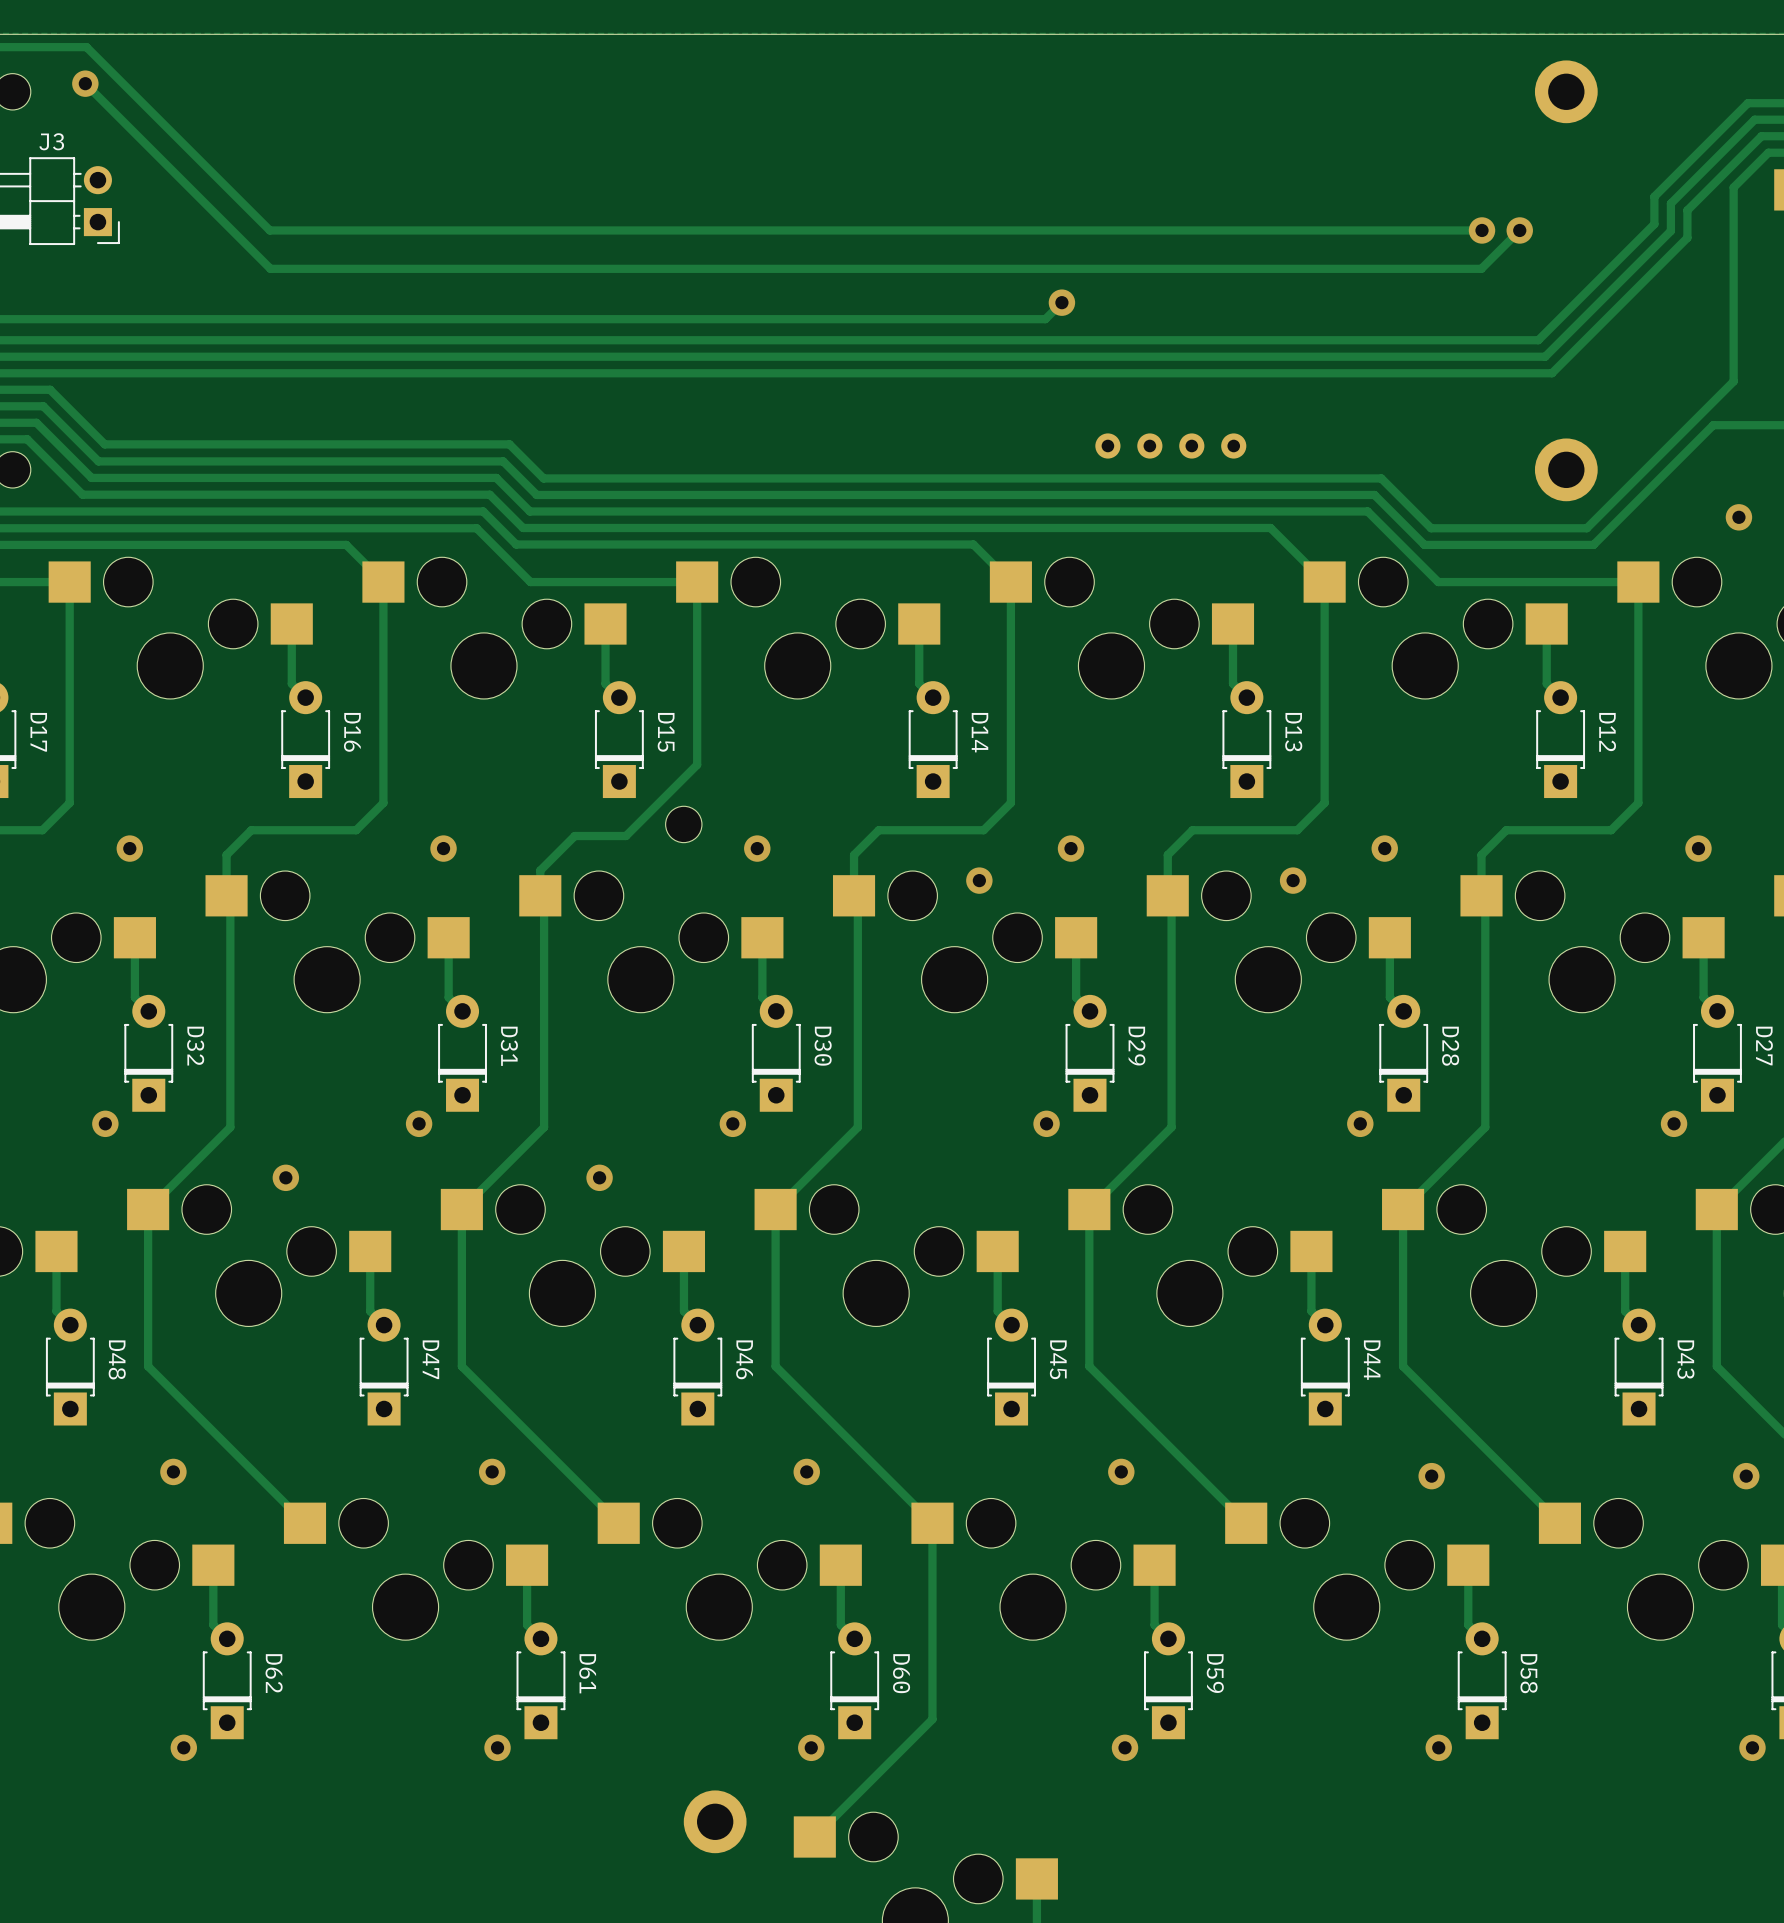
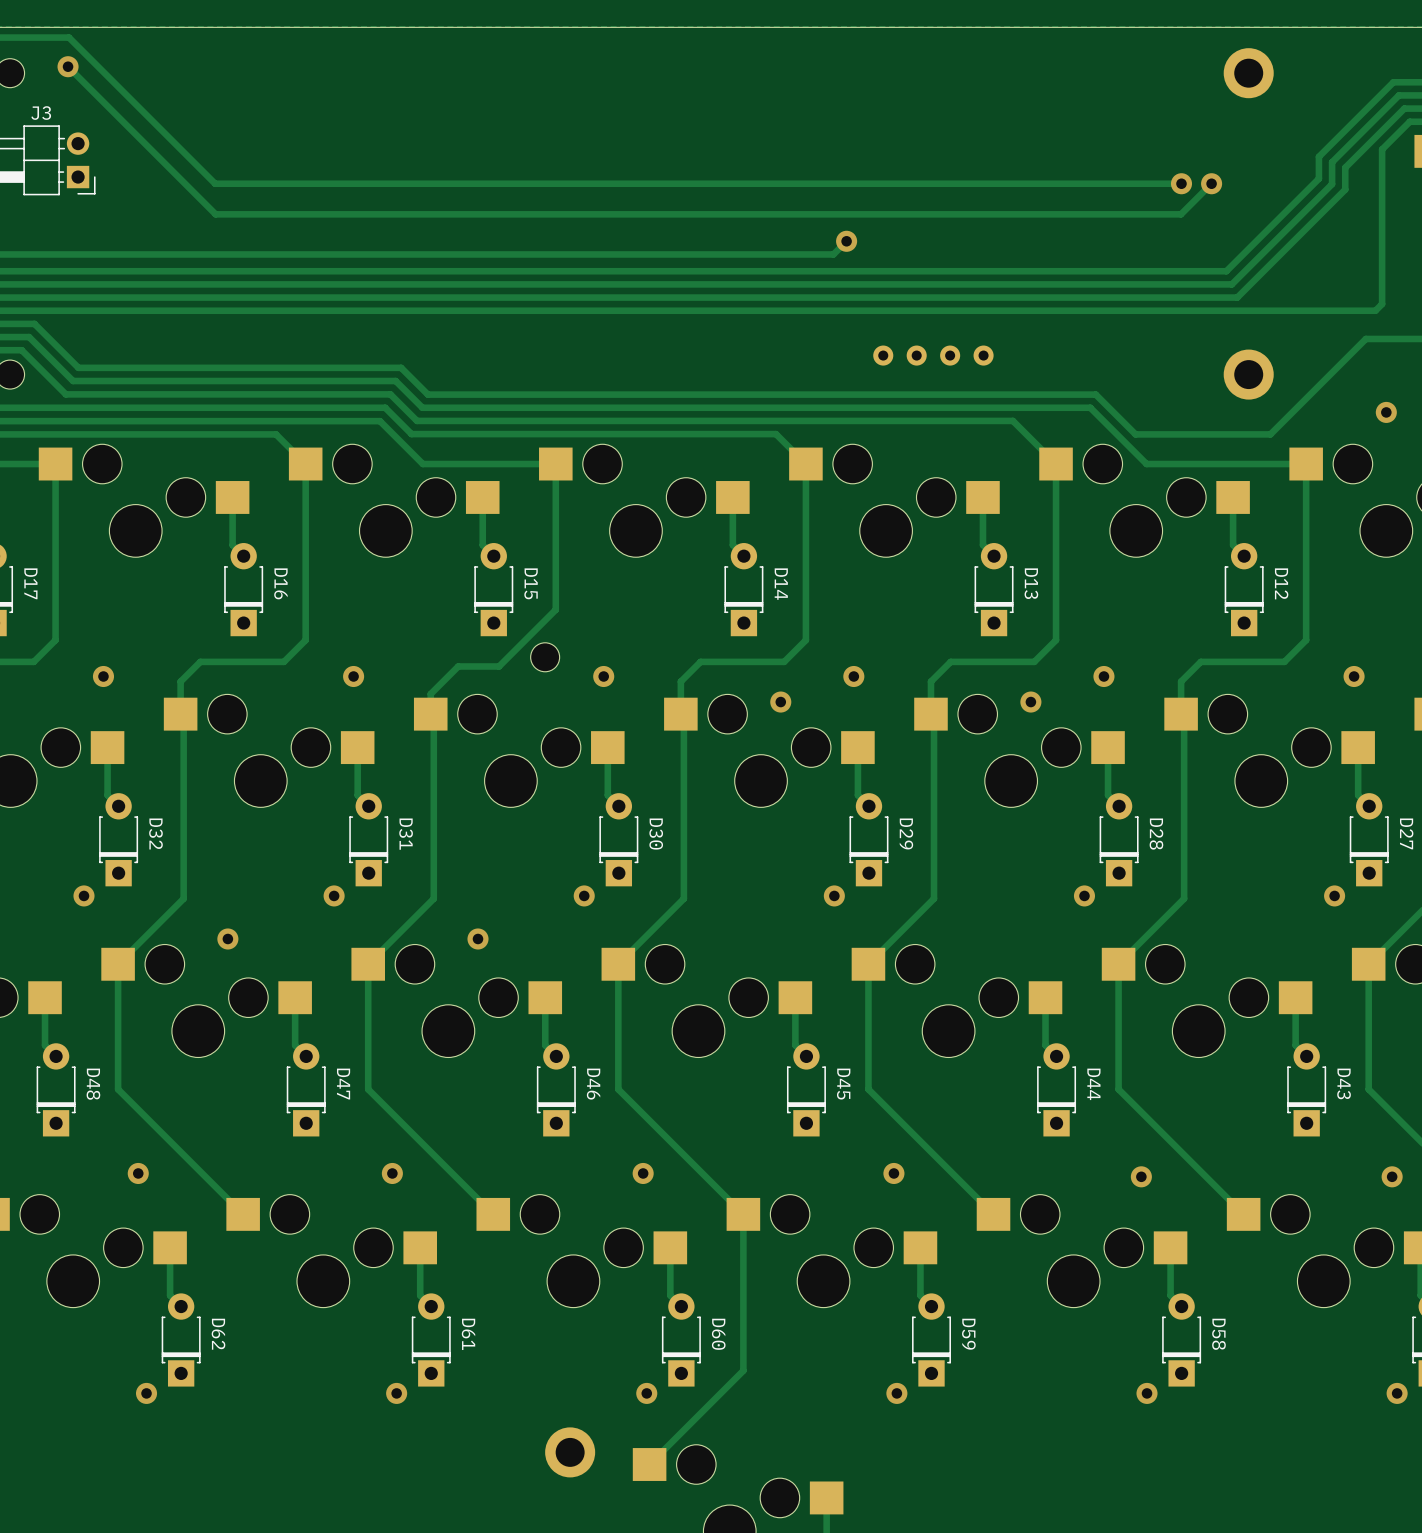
track: (1725, 389) (1586, 528) (1431, 528) (1381, 478) (543, 478) (509, 444) (104, 444) (50, 389) -> (1375, 310) (40, 310)

